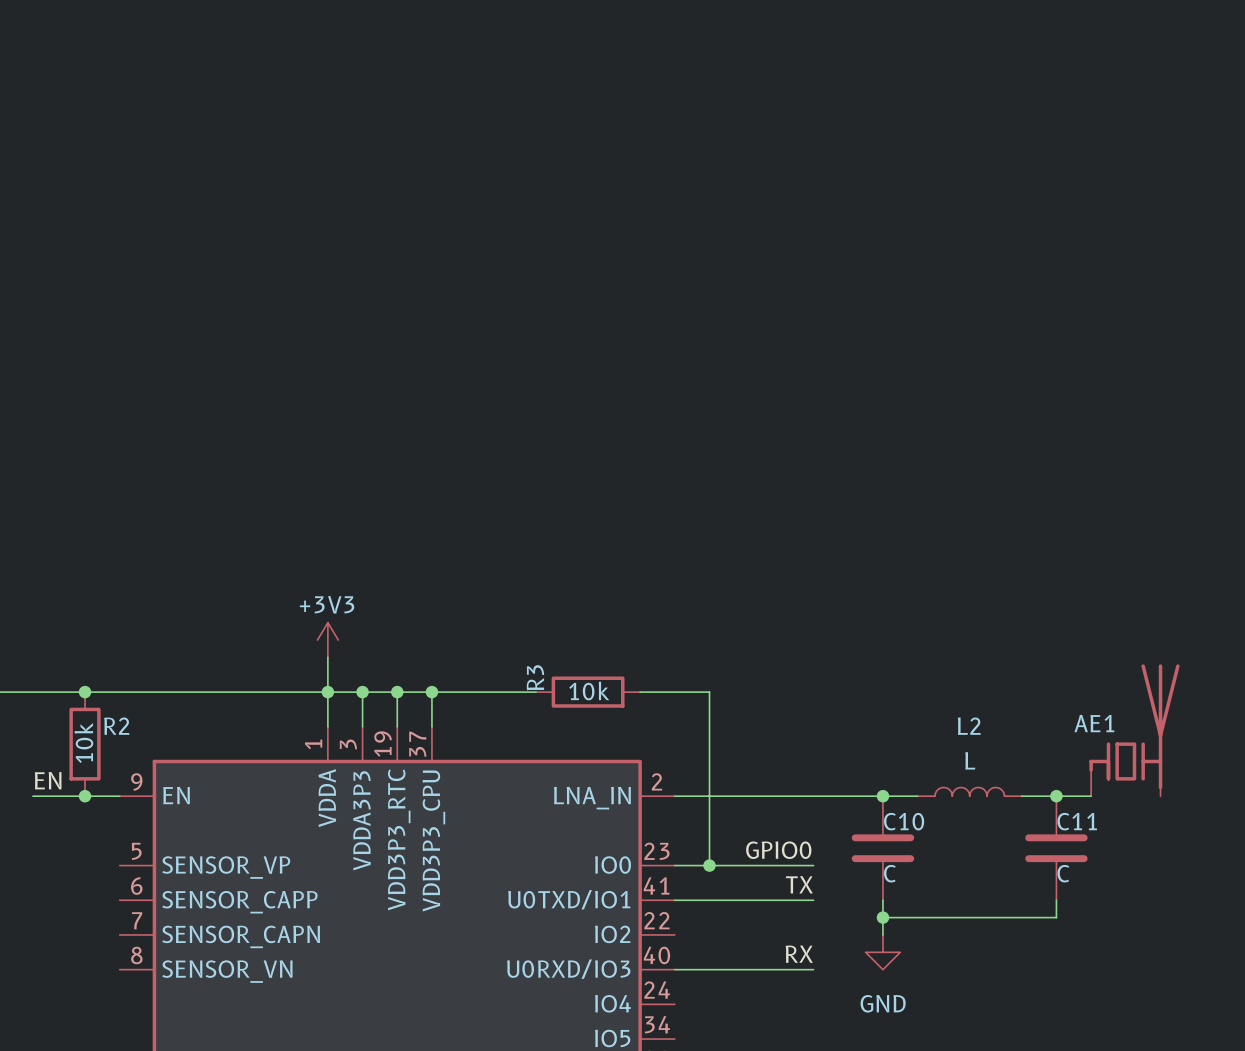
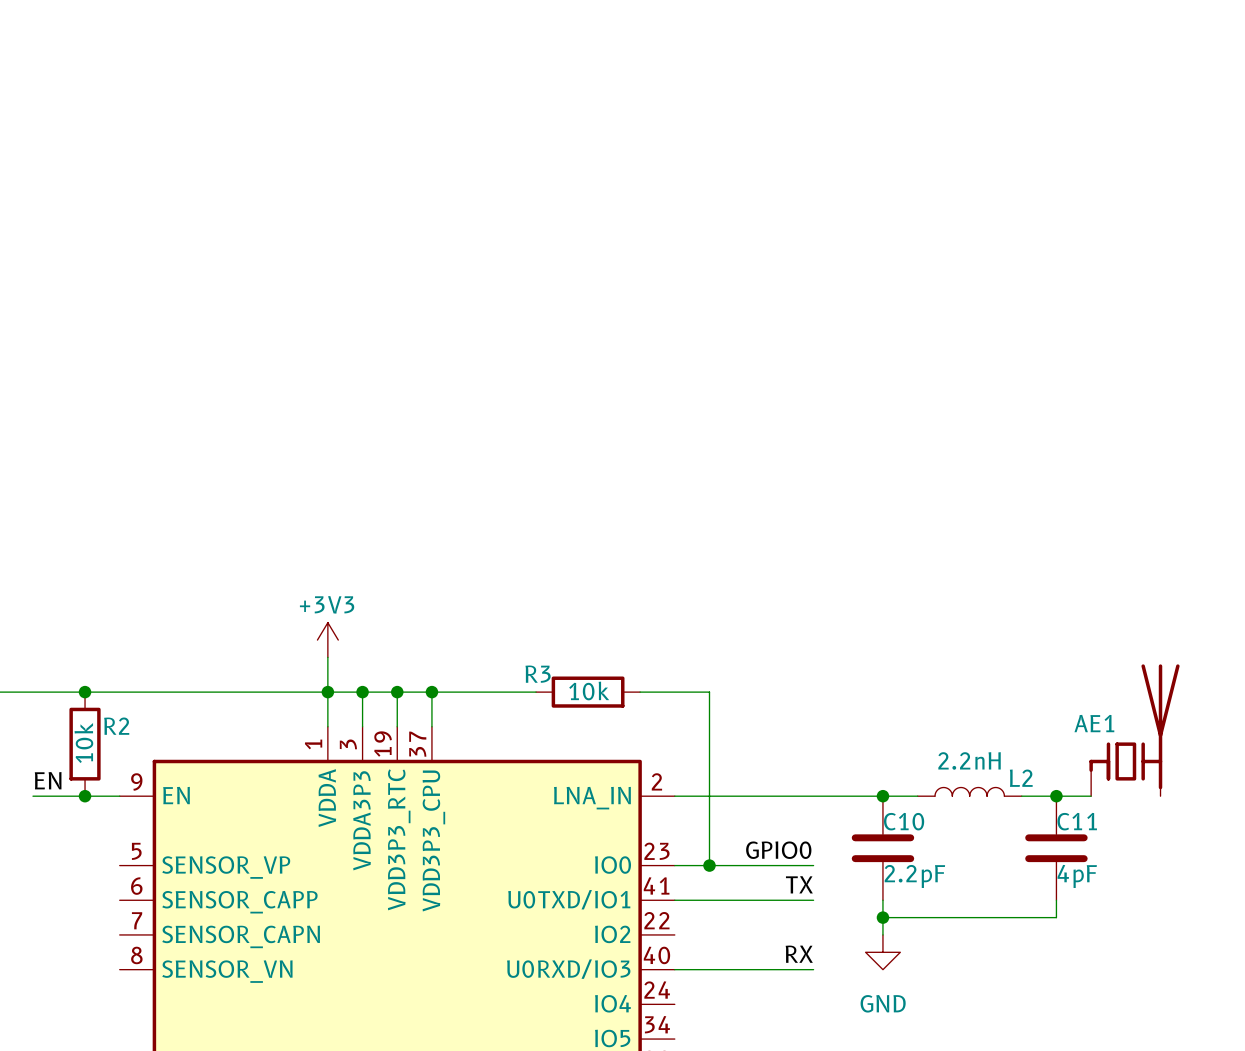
R3 name rotation: 0° (535, 677) -> 90° clockwise (538, 674)
L2 name position: L2 (969, 726) -> L2 (1021, 778)
L2 value: L (970, 760) -> 2.2nH (969, 760)
C10 value: C (889, 873) -> 2.2pF (914, 876)
C11 value: C (1063, 873) -> 4pF (1077, 876)

